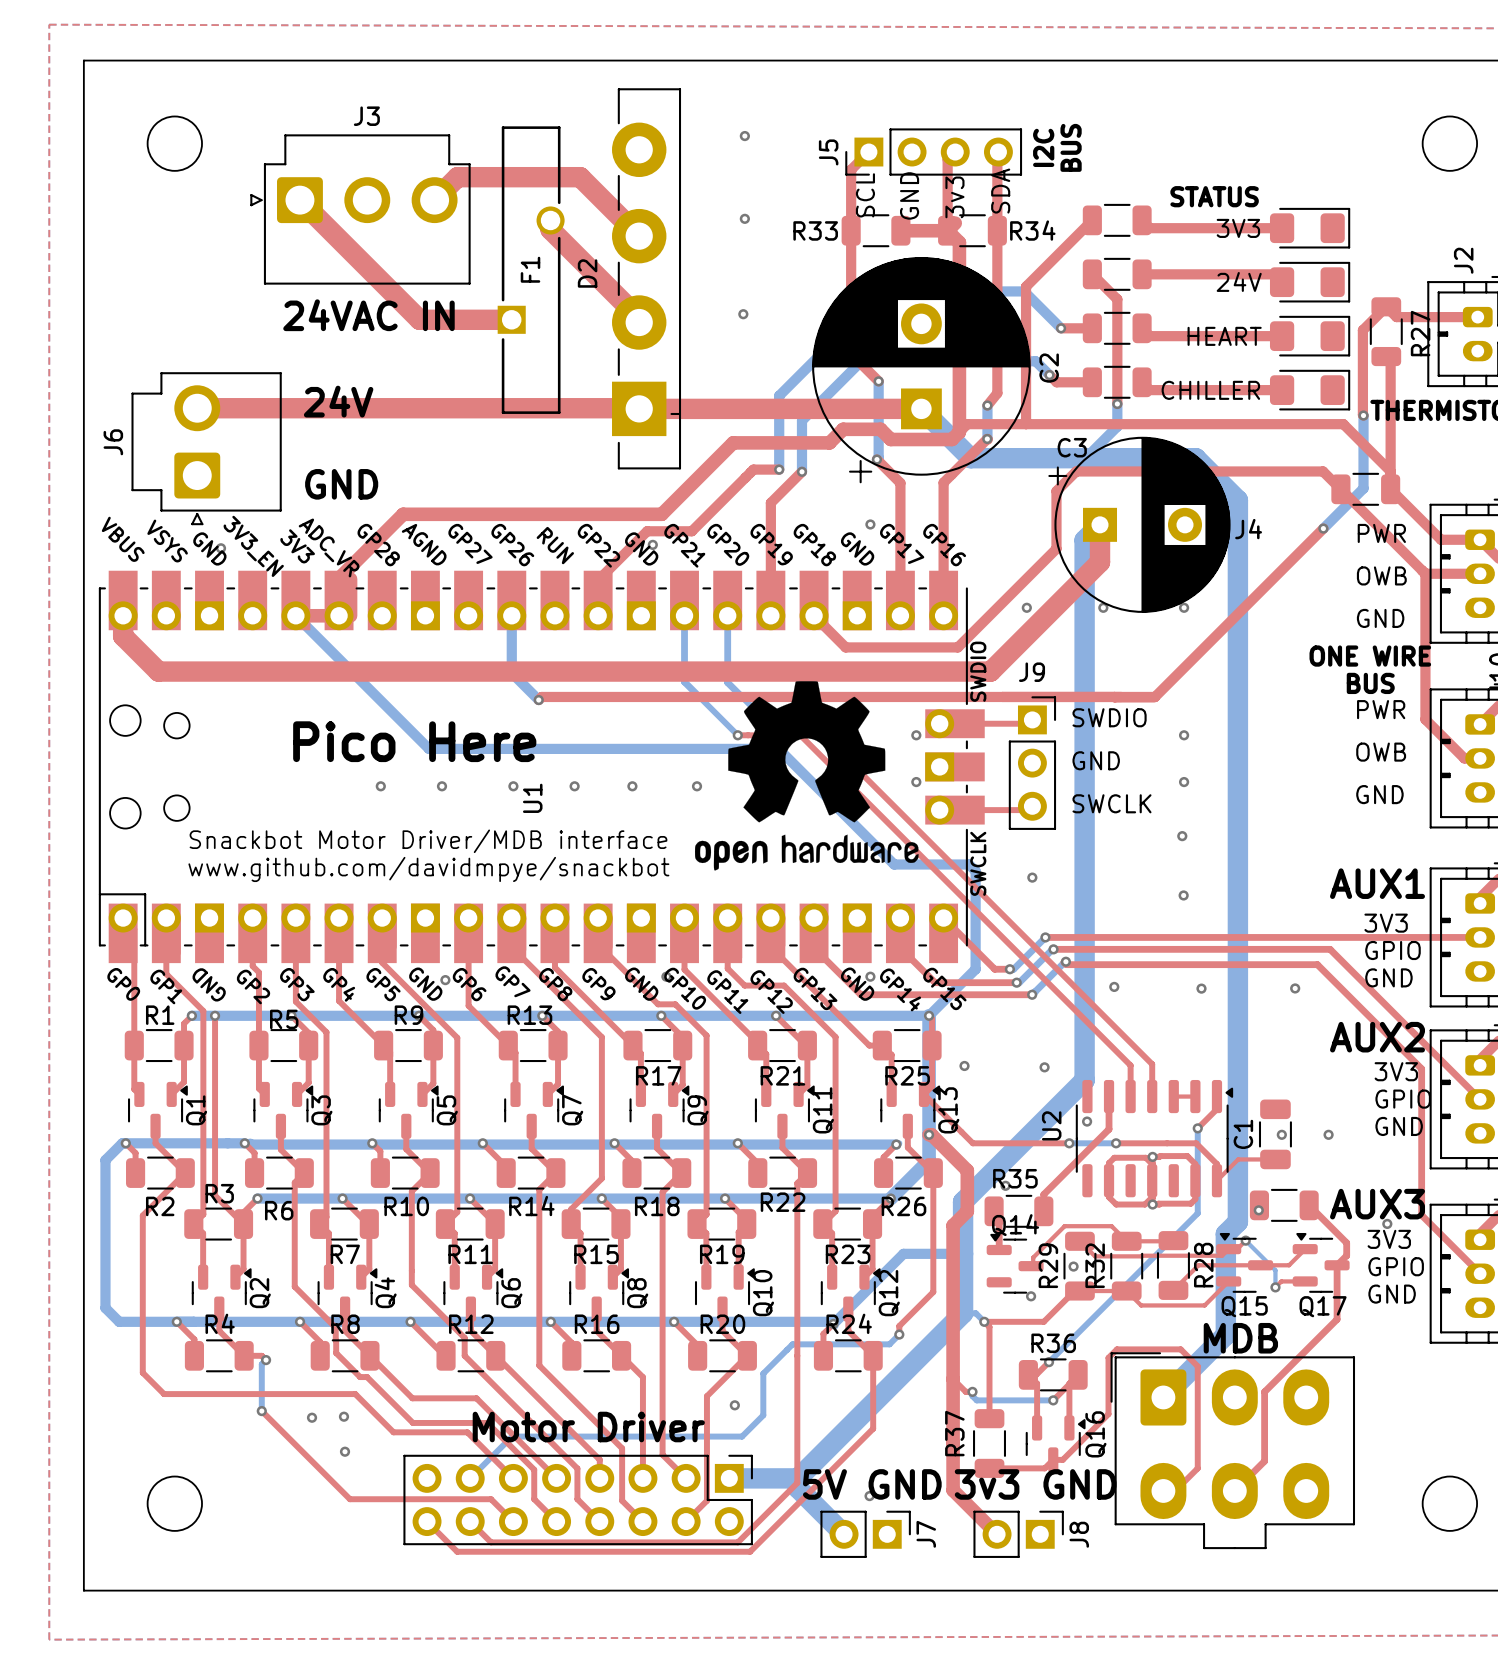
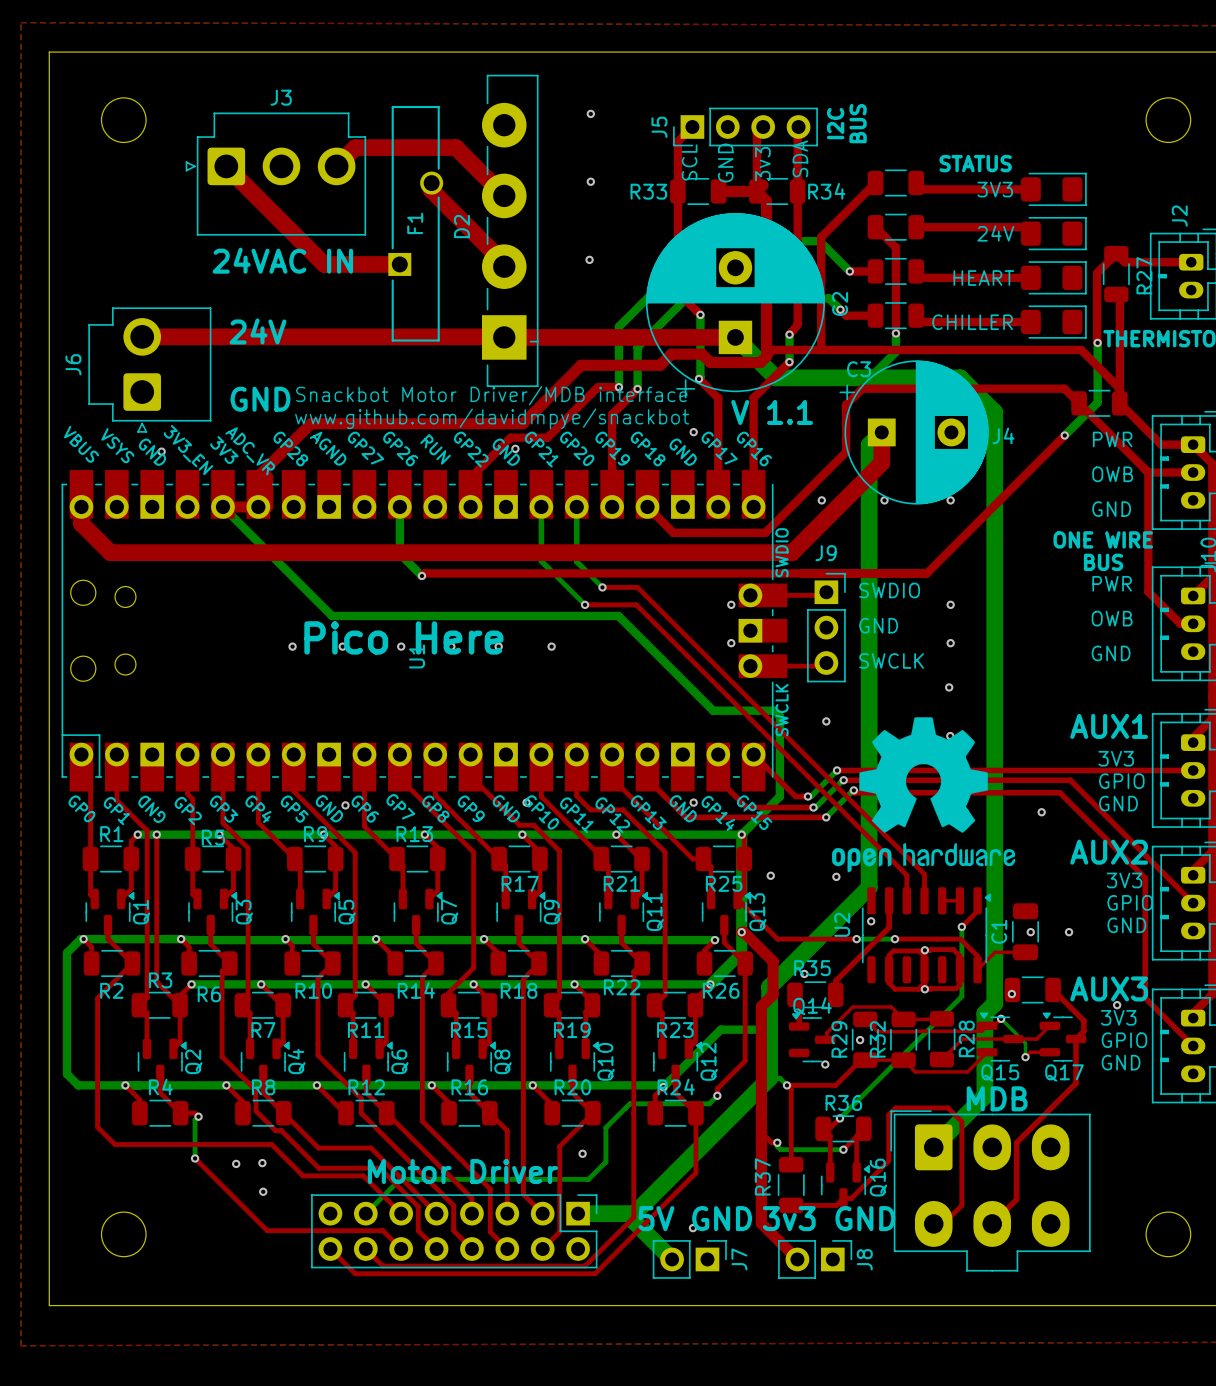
text: none -> V 1.1 (772, 412)
text position: Pico Here (414, 741) -> Pico Here (403, 637)
drawing position: (806, 775) -> (923, 794)
text position: Snackbot Motor Driver/MDB interface (428, 841) -> Snackbot Motor Driver/MDB interface (491, 395)
text position: www.github.com/davidmpye/snackbot (428, 869) -> www.github.com/davidmpye/snackbot (492, 418)

